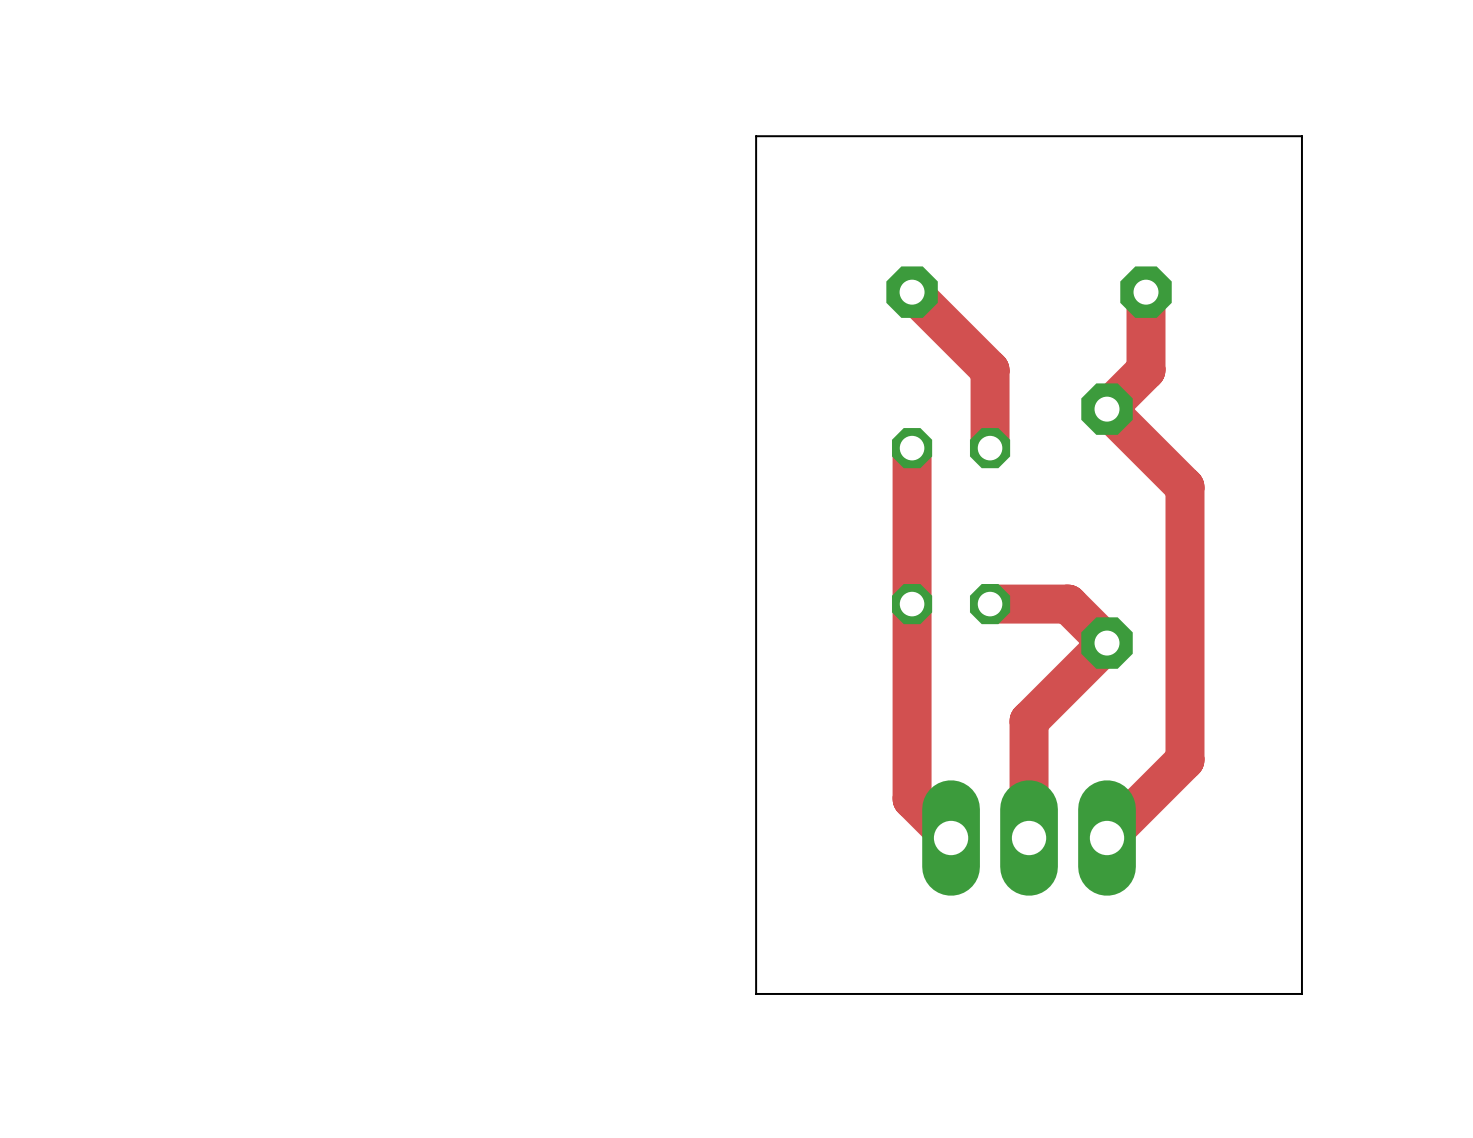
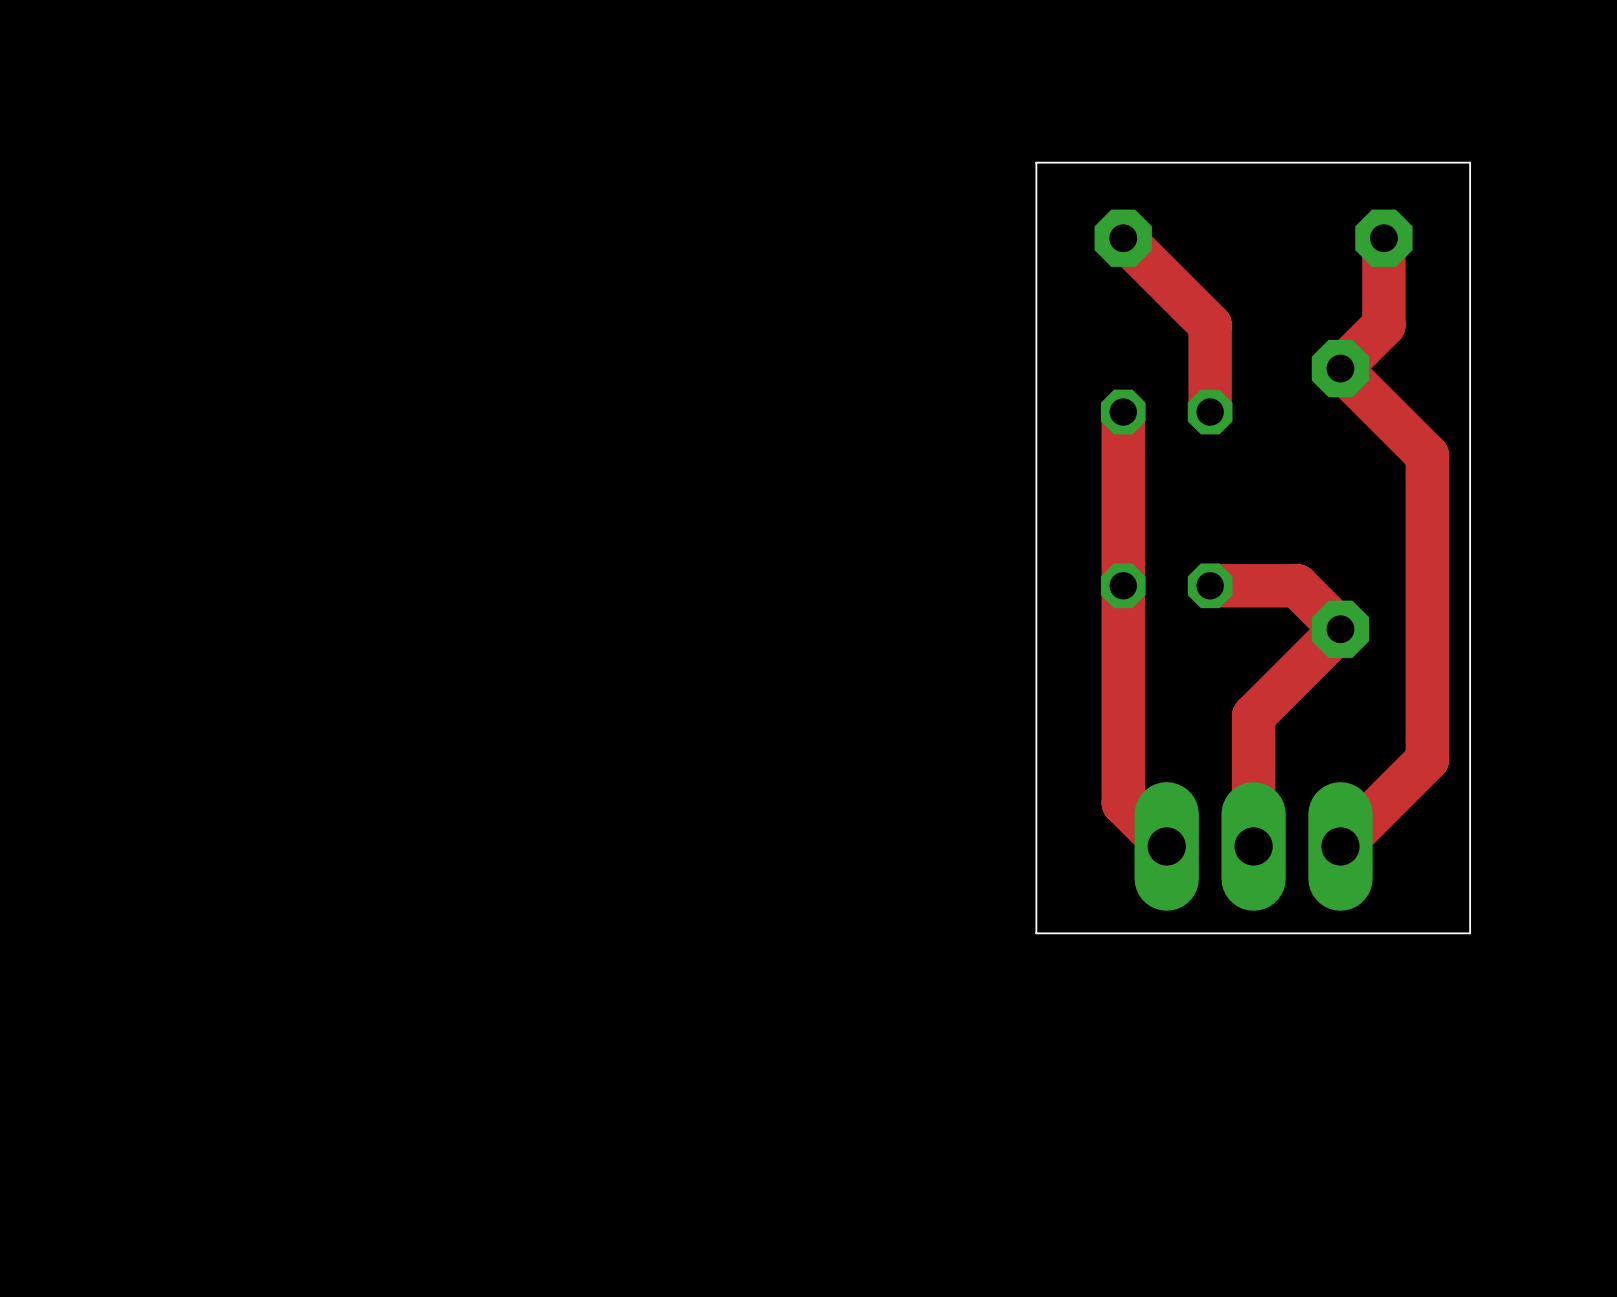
board edge: (756, 136) (1301, 136) (1301, 993) (756, 993) (756, 136) -> (1036, 162) (1036, 933) (1470, 933) (1470, 162) (1036, 162)

